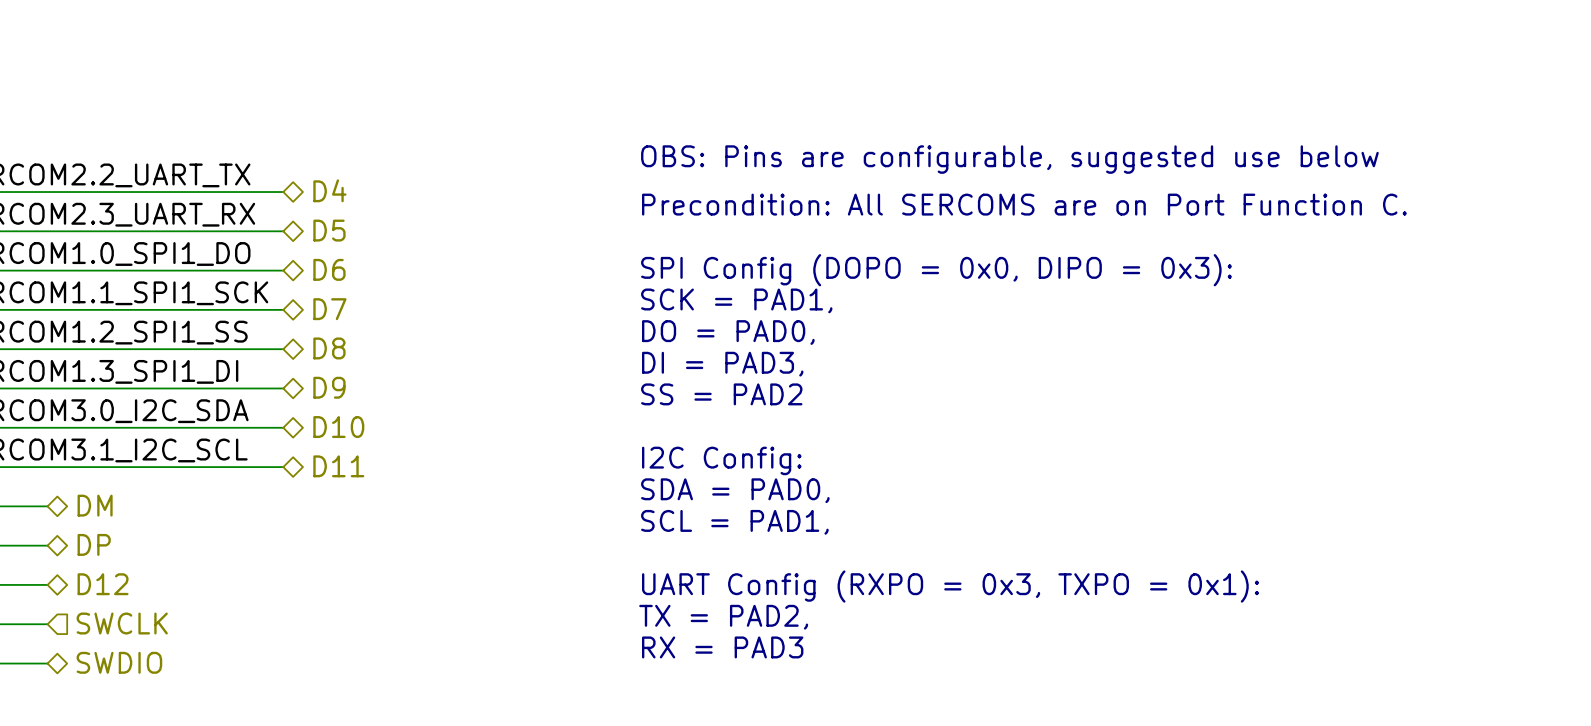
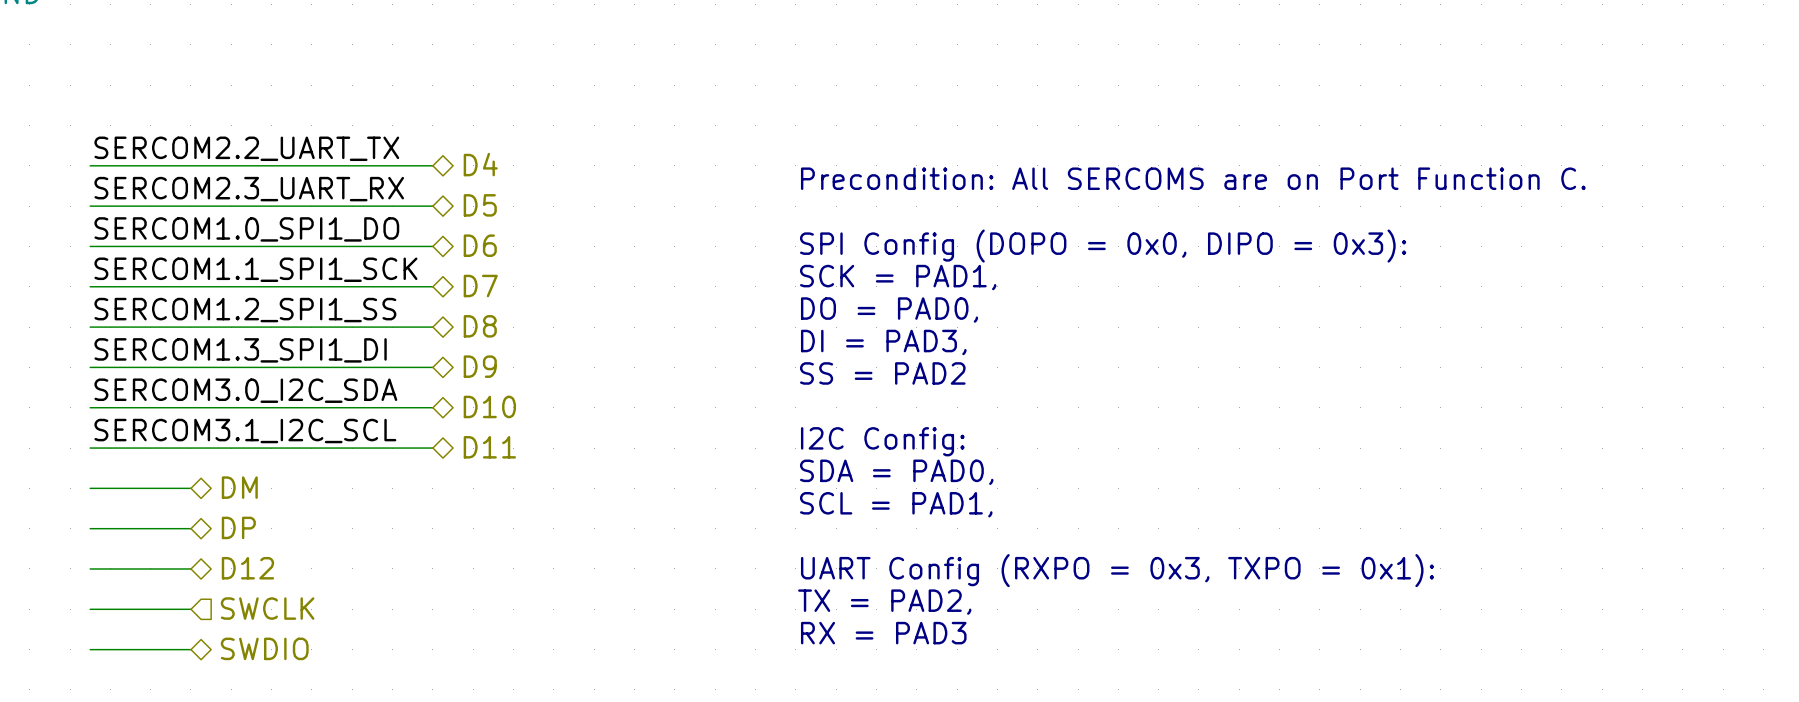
text: OBS: Pins are configurable, suggested use below (1009, 159) -> none

